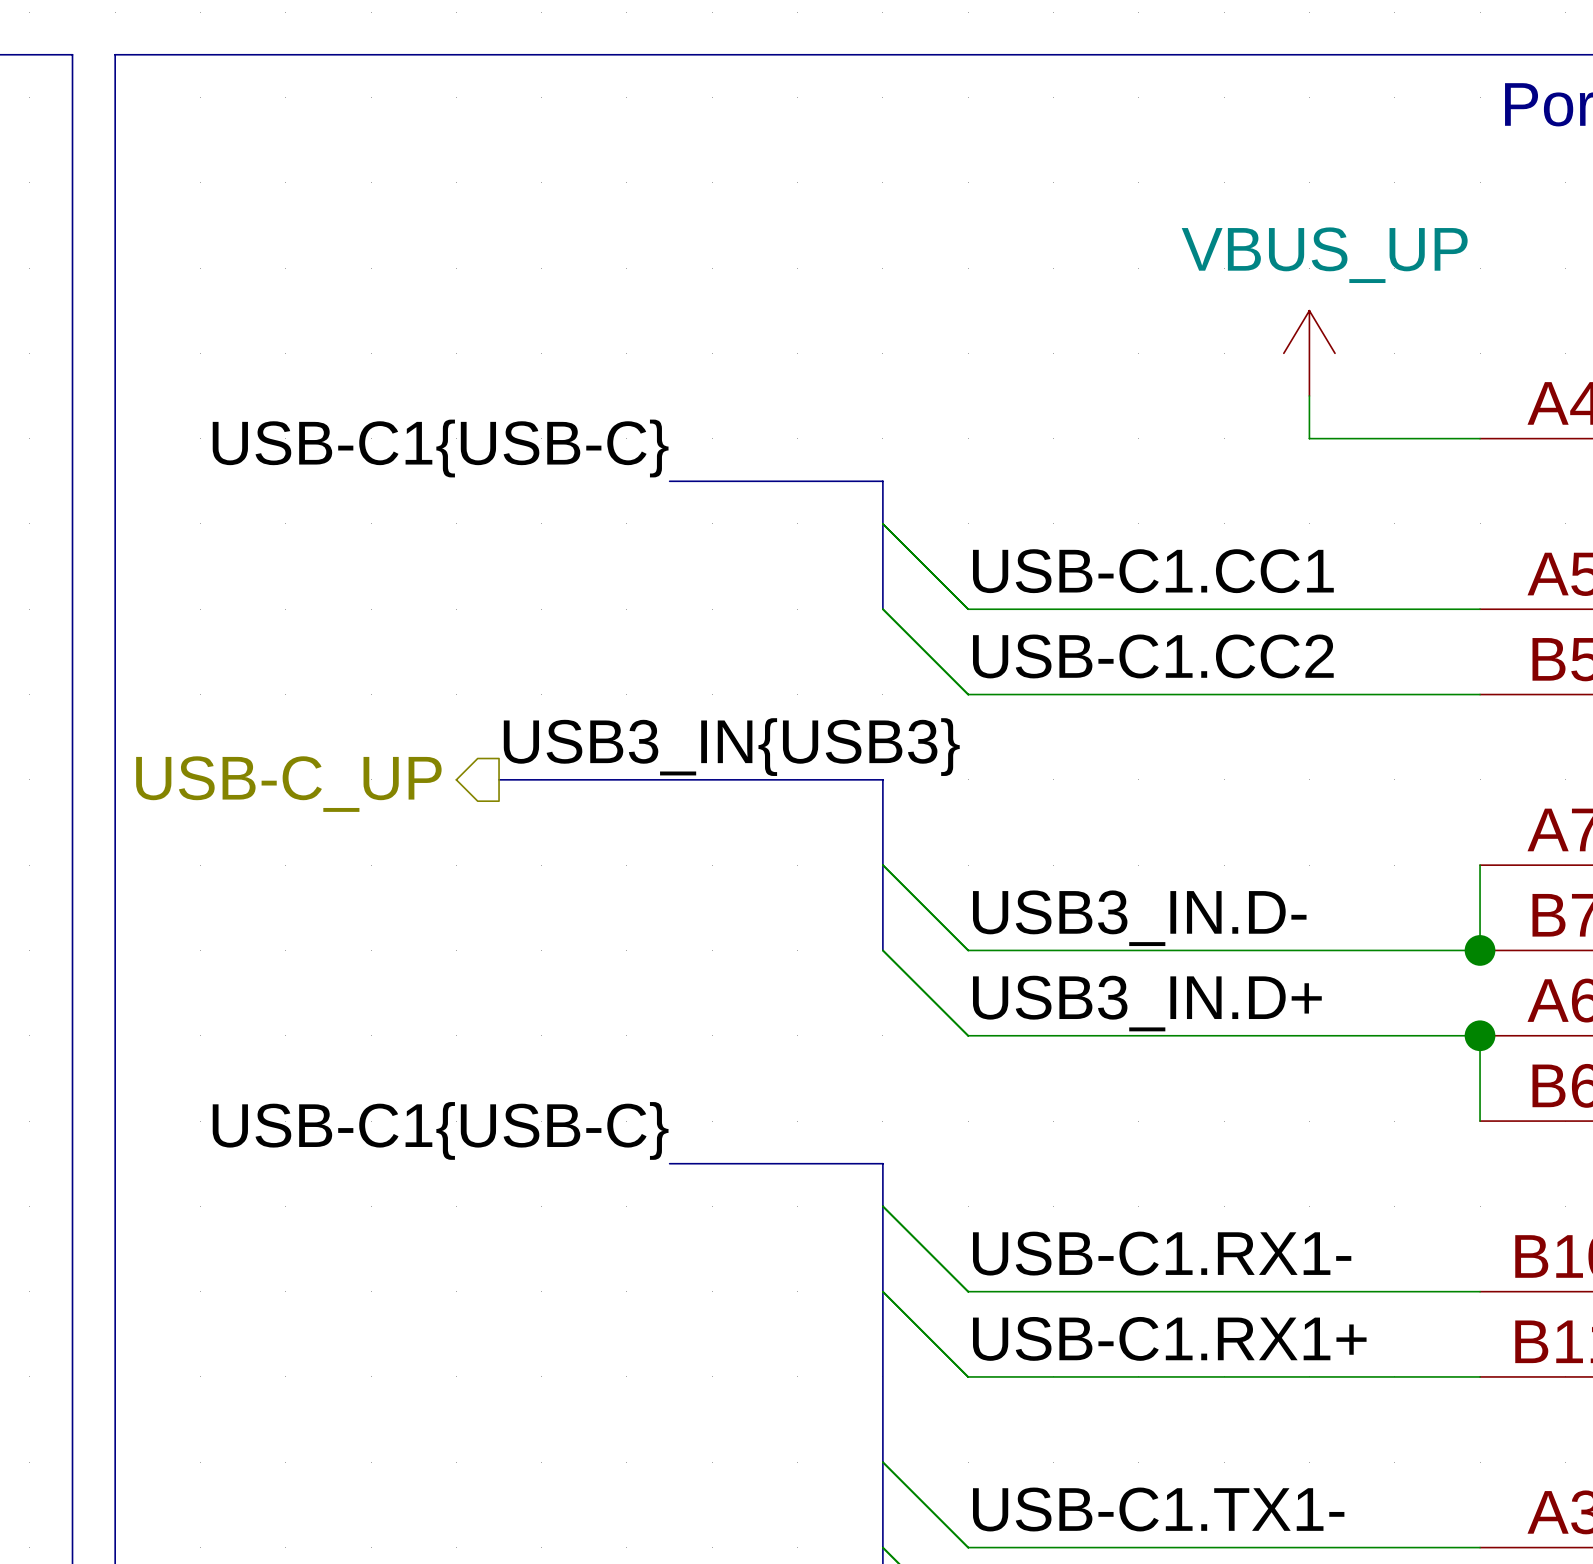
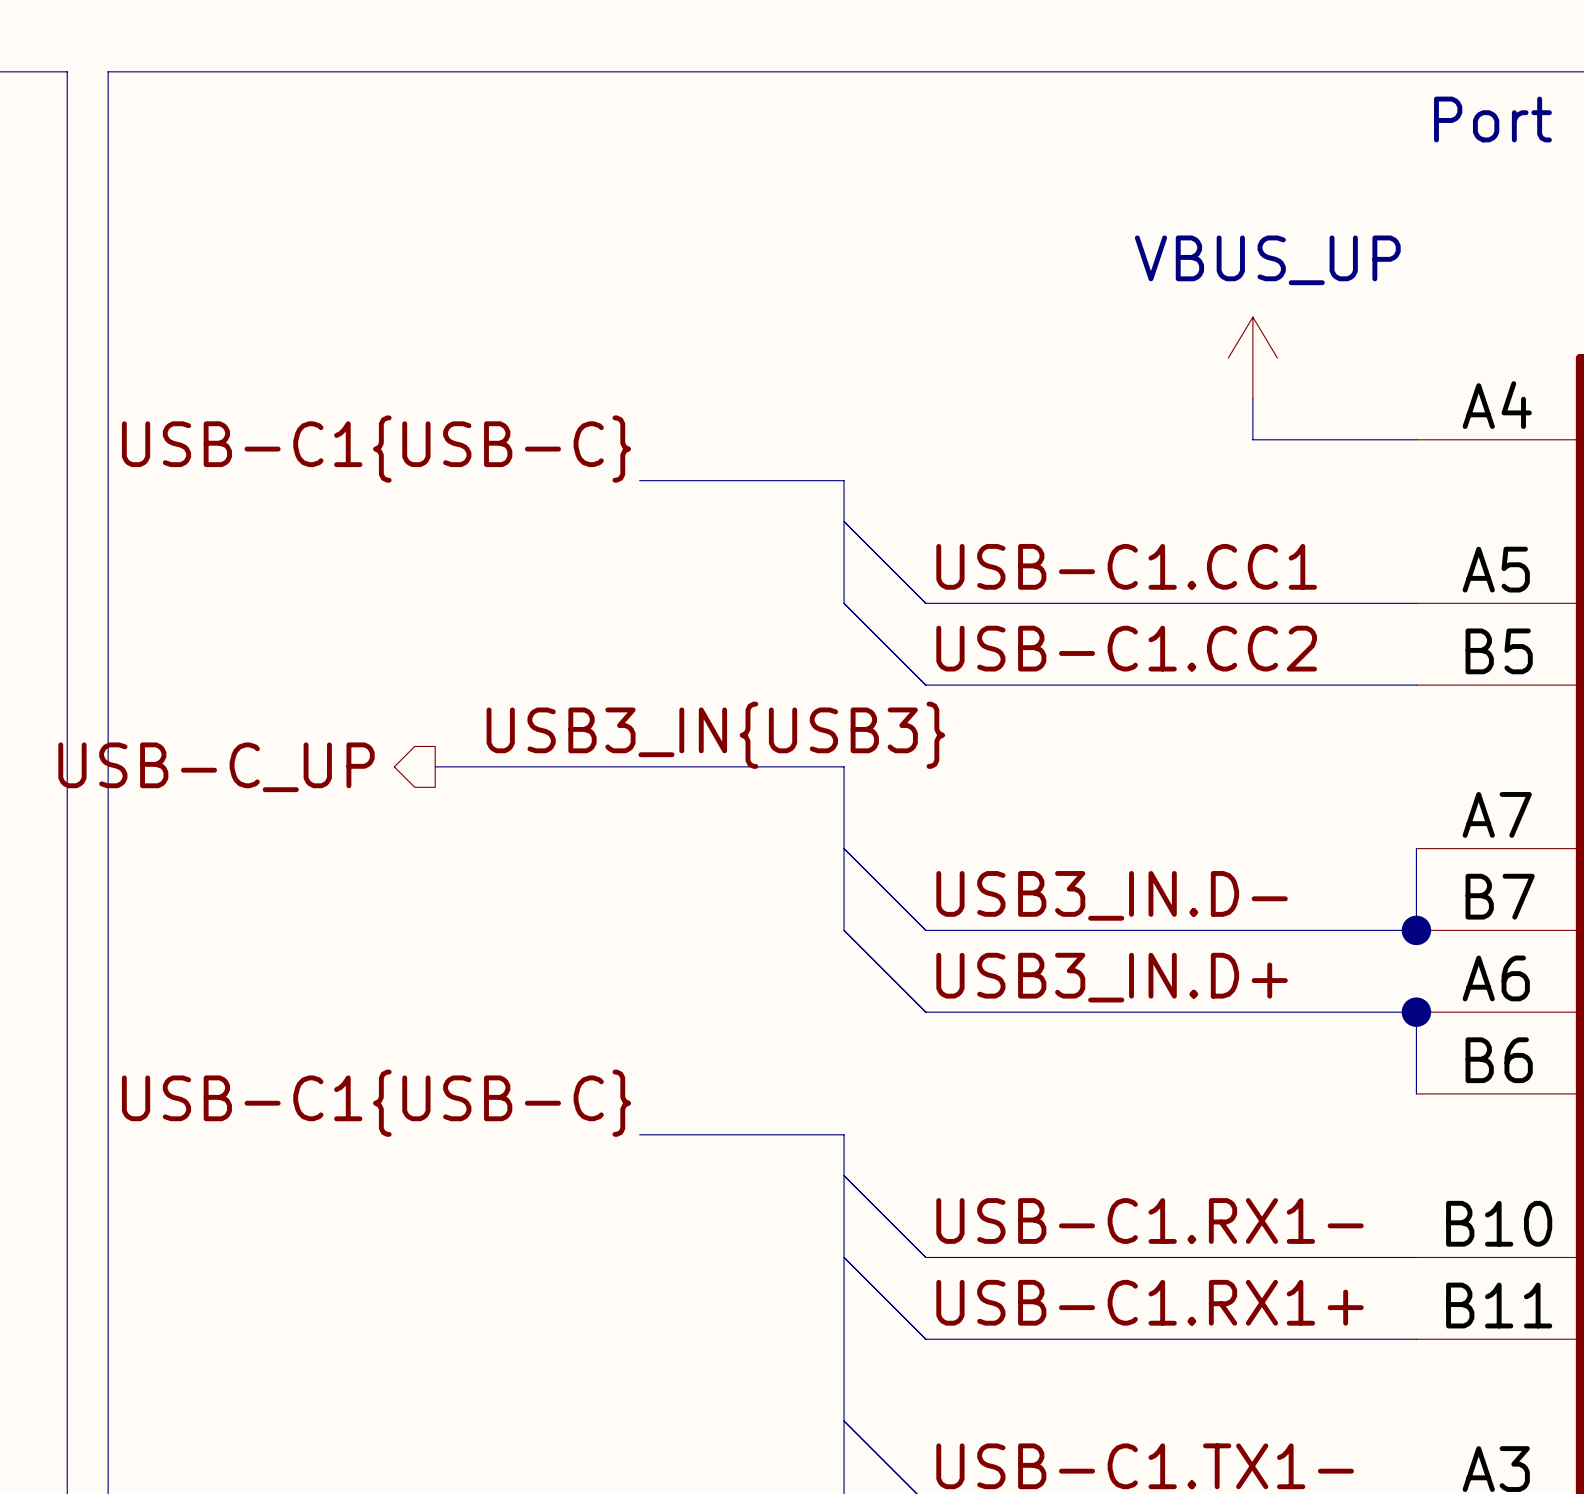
bus: none -> (435, 766) (476, 766)
hierarchical label position: USB-C_UP (288, 784) -> USB-C_UP (216, 767)

